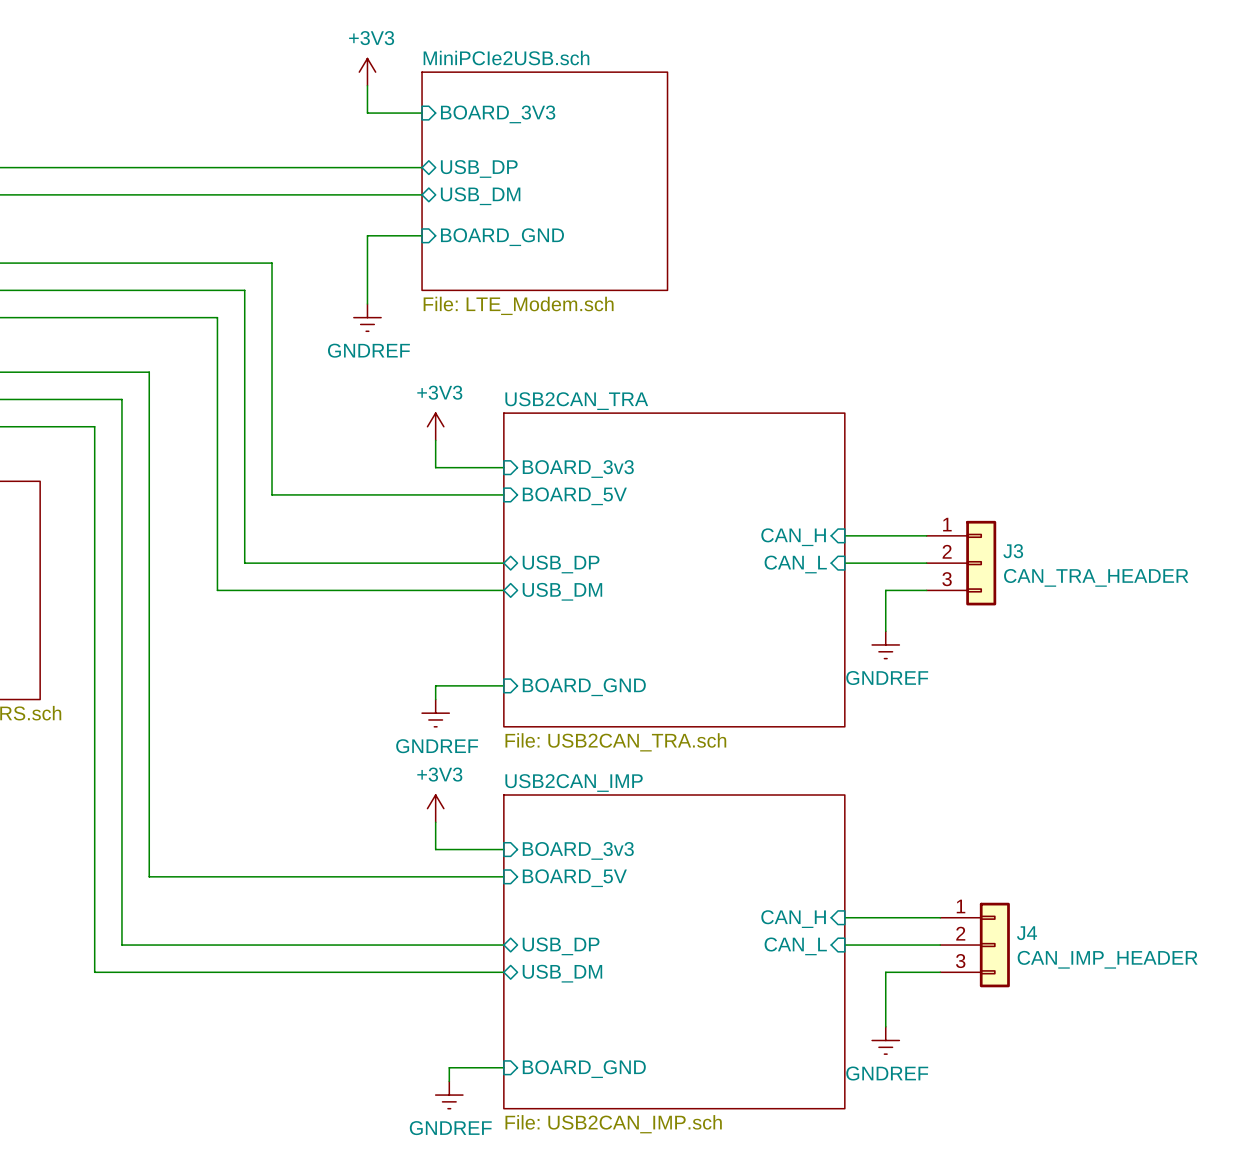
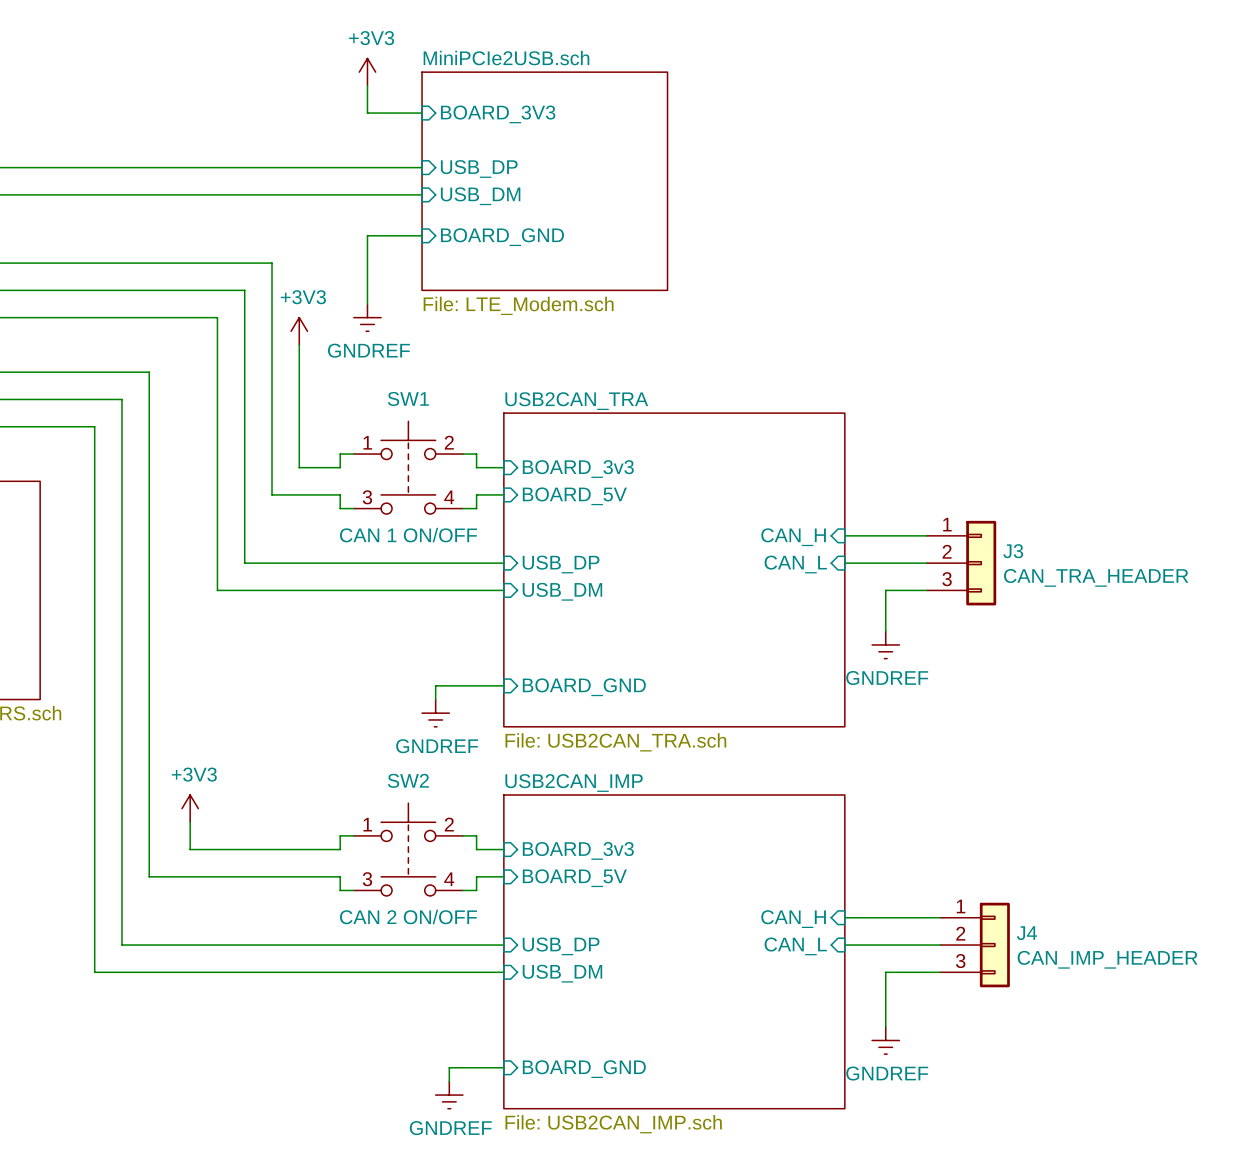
sheet pin shape: bidirectional (479, 168) -> input (479, 168)
sheet pin shape: bidirectional (480, 196) -> input (480, 196)
wire: none -> (299, 344) (299, 467) (340, 467) (340, 454) (353, 454)
power symbol position: +3V3 (435, 426) -> +3V3 (299, 331)
wire: (435, 440) (435, 467) (476, 467) -> (462, 454) (476, 454) (476, 467)
SW1: none -> CAN 1 ON/OFF (408, 467)
wire: (340, 494) (476, 494) -> (340, 494) (340, 508) (353, 508)
wire: none -> (476, 494) (476, 508) (462, 508)
sheet pin shape: bidirectional (561, 564) -> input (561, 564)
sheet pin shape: bidirectional (562, 591) -> input (562, 591)
power symbol: none -> +3V3 (190, 808)
power symbol: +3V3 (435, 808) -> none
wire: none -> (190, 822) (190, 849) (340, 849) (340, 835) (353, 835)
wire: (435, 822) (435, 849) (476, 849) -> (462, 835) (476, 835) (476, 849)
SW2: none -> CAN 2 ON/OFF (408, 849)
wire: (340, 876) (476, 876) -> (340, 876) (340, 890) (353, 890)
wire: none -> (476, 876) (476, 890) (462, 890)
sheet pin shape: bidirectional (561, 946) -> input (561, 946)
sheet pin shape: bidirectional (562, 973) -> input (562, 973)

